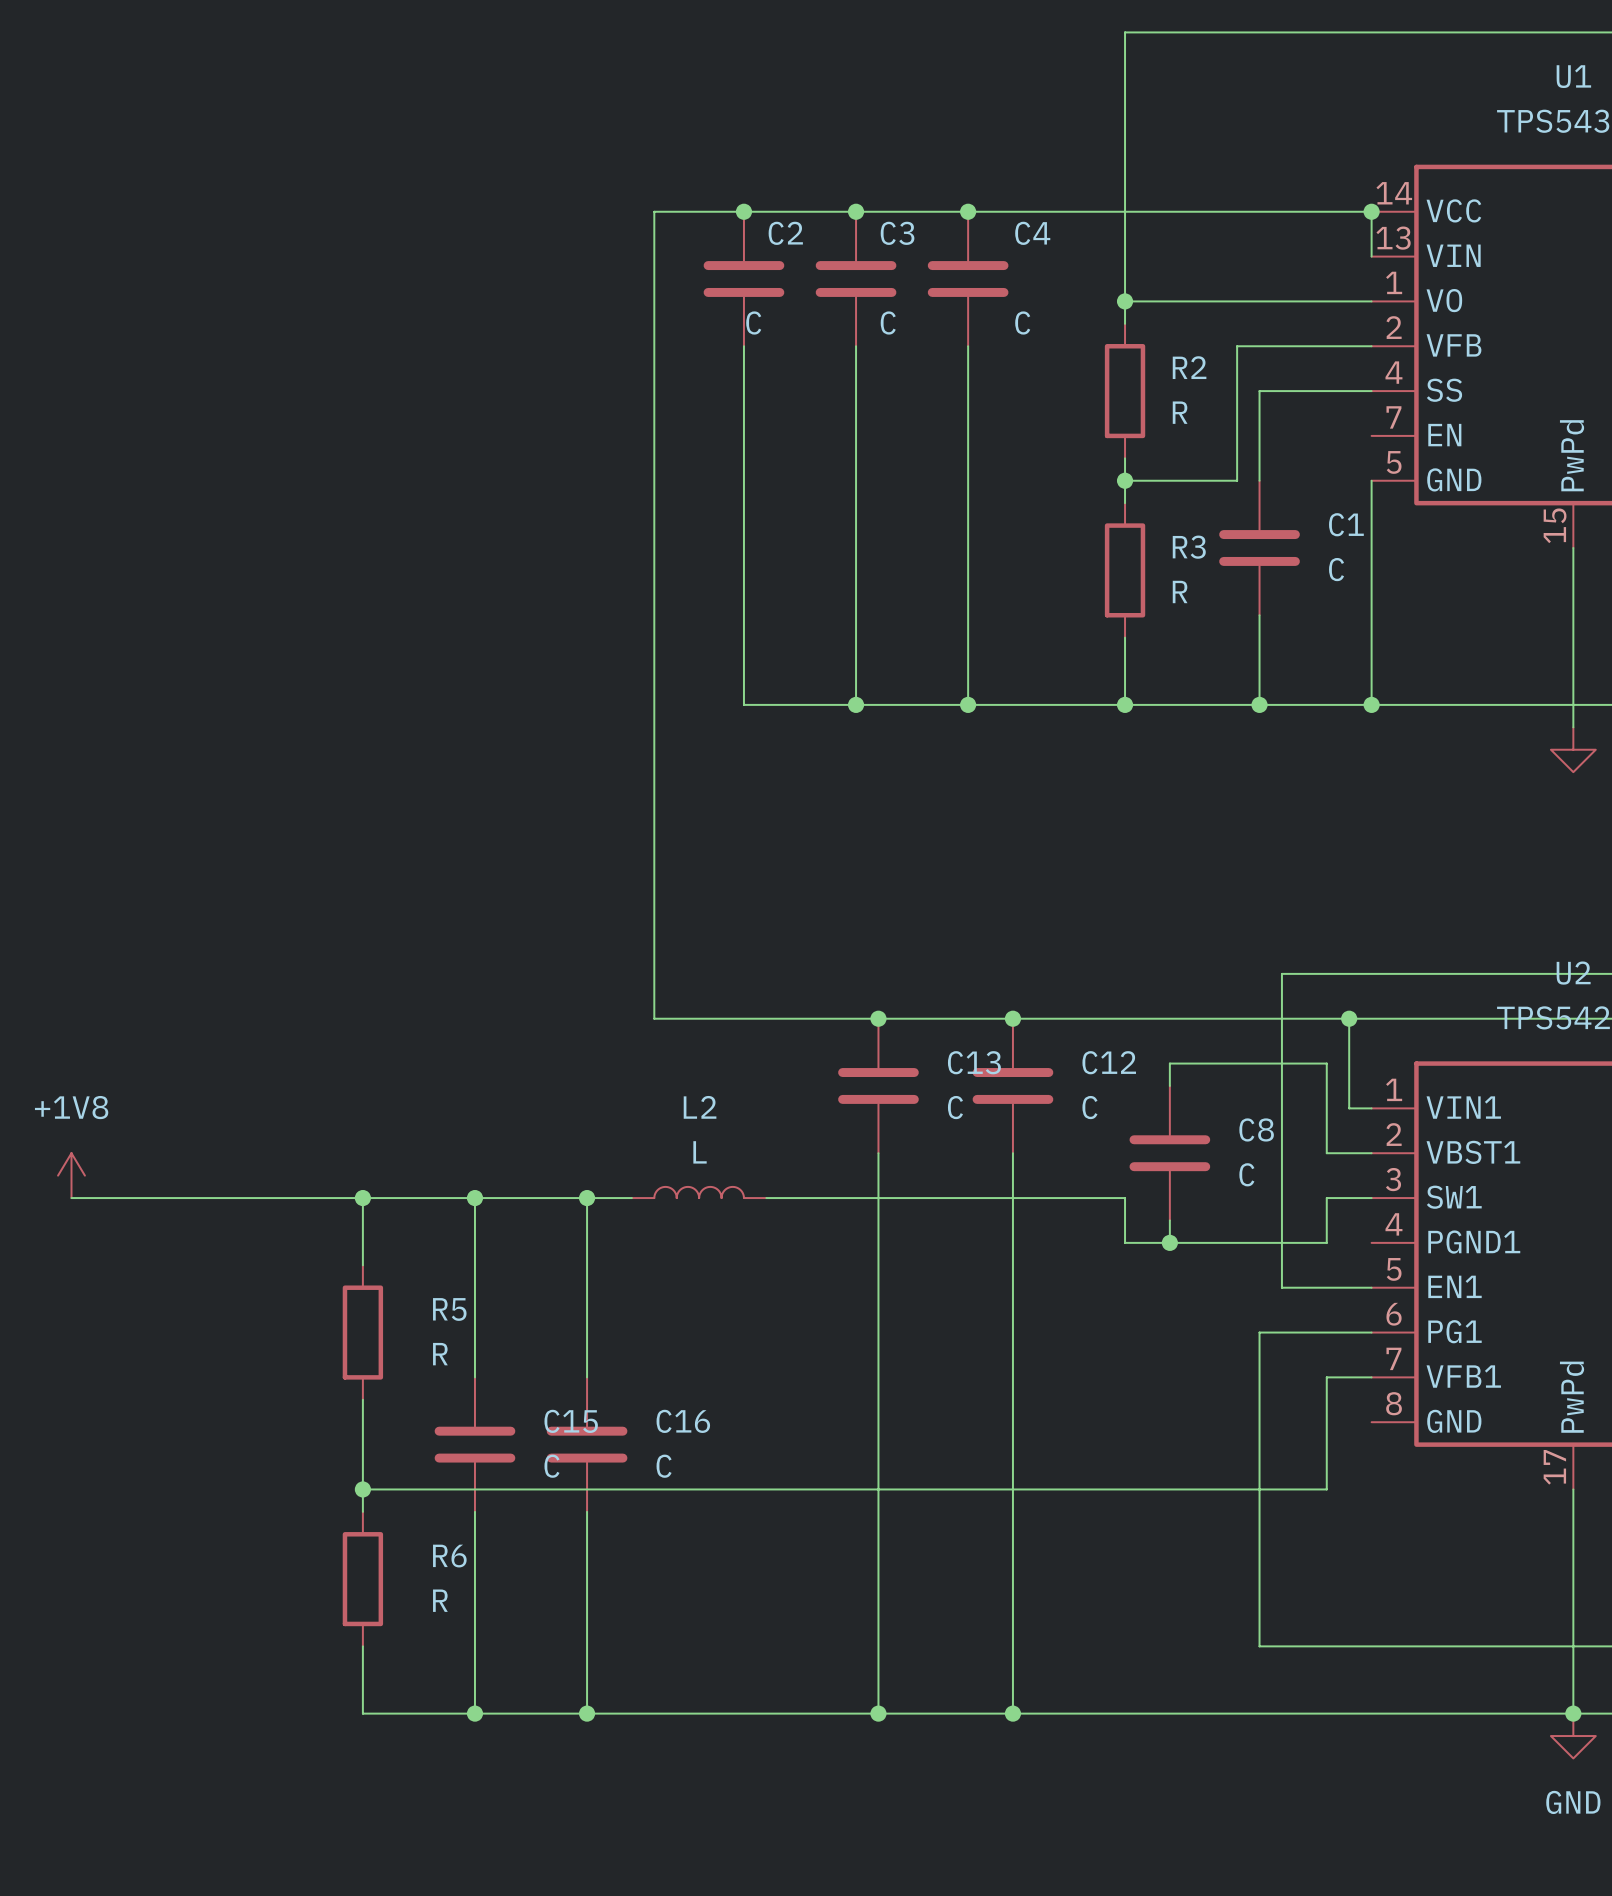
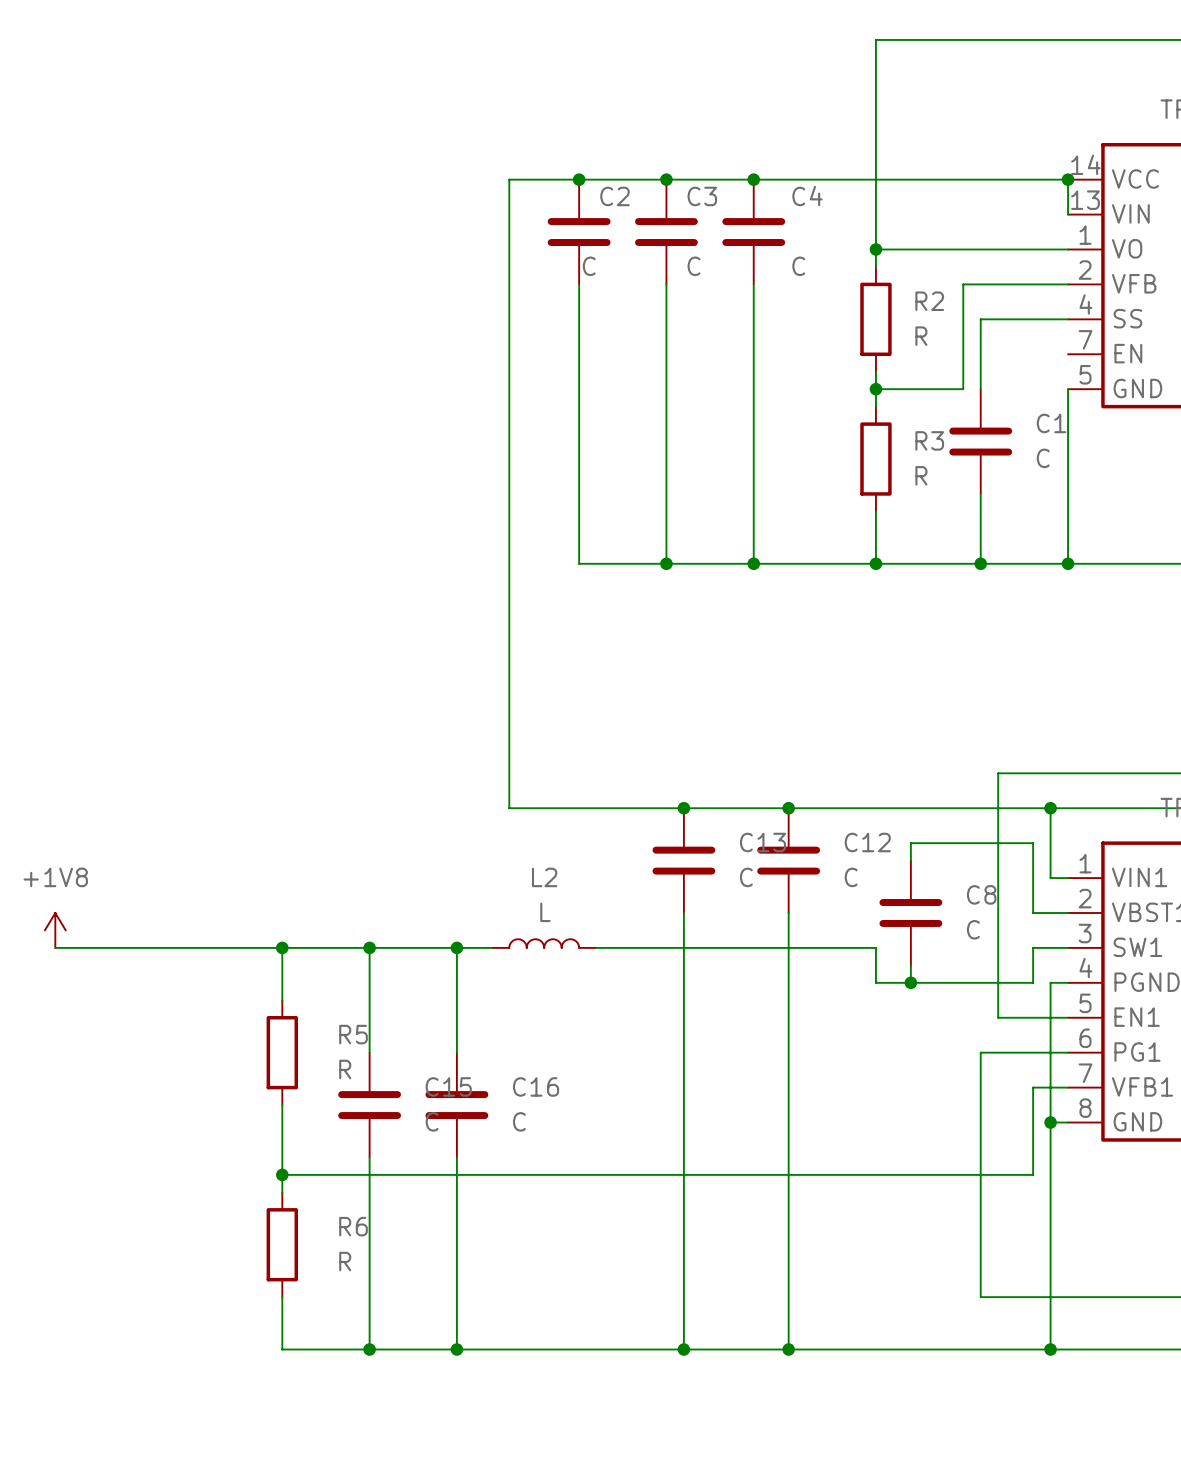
wire: none -> (1068, 982) (1050, 982) (1050, 1349)
wire: none -> (1050, 1122) (1068, 1122)
junction: none -> (1050, 1122)
C15 position: (474, 1444) -> (369, 1105)
C16 position: (587, 1444) -> (456, 1105)
junction: none -> (1050, 1349)

